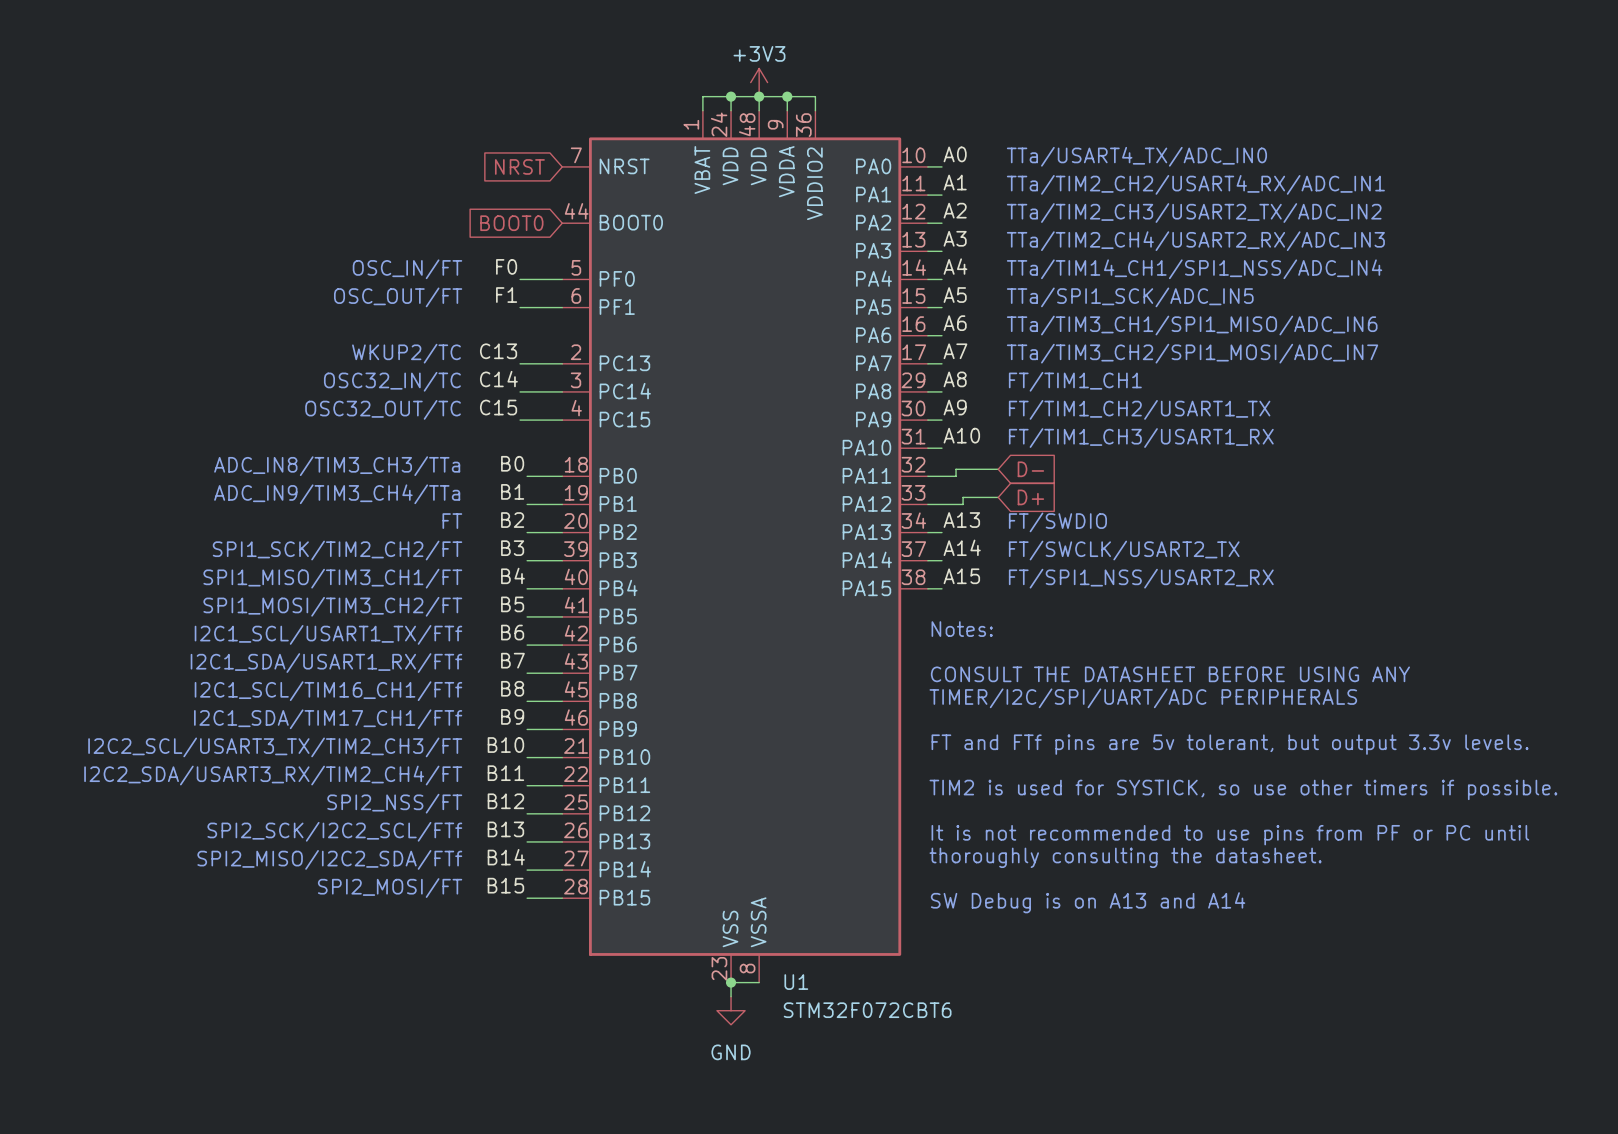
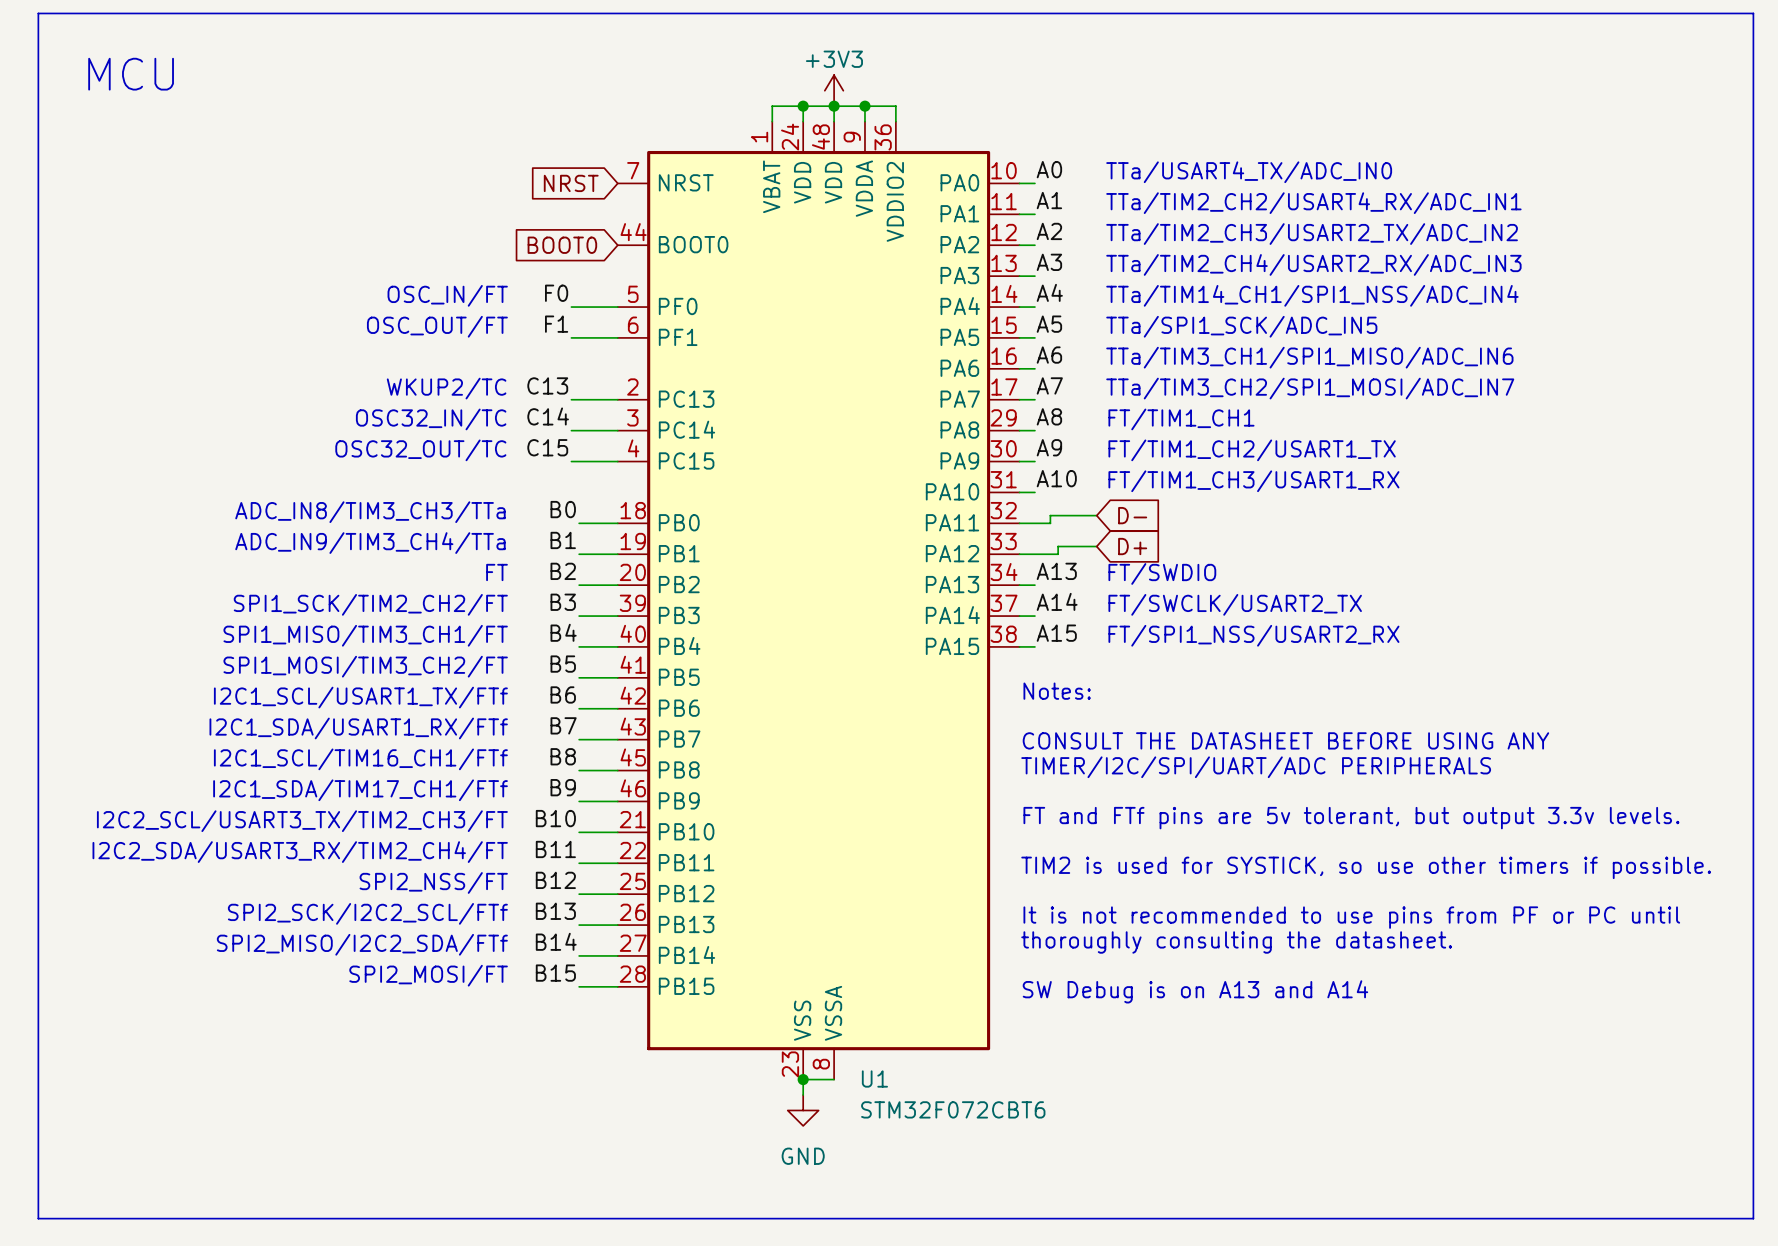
line: none -> (38, 13) (1753, 13) (1753, 1218) (38, 1218) (38, 13)
text: none -> MCU (131, 74)

